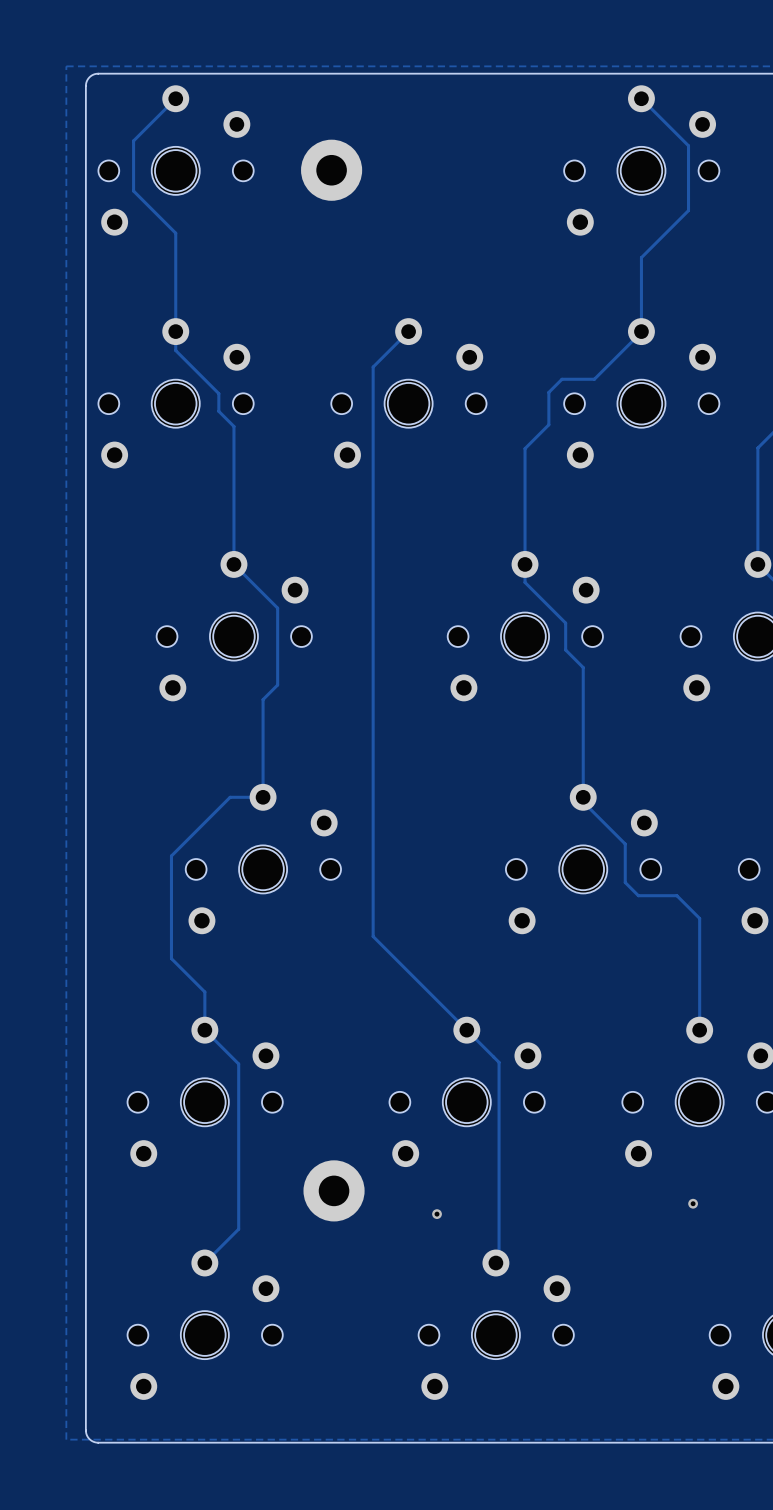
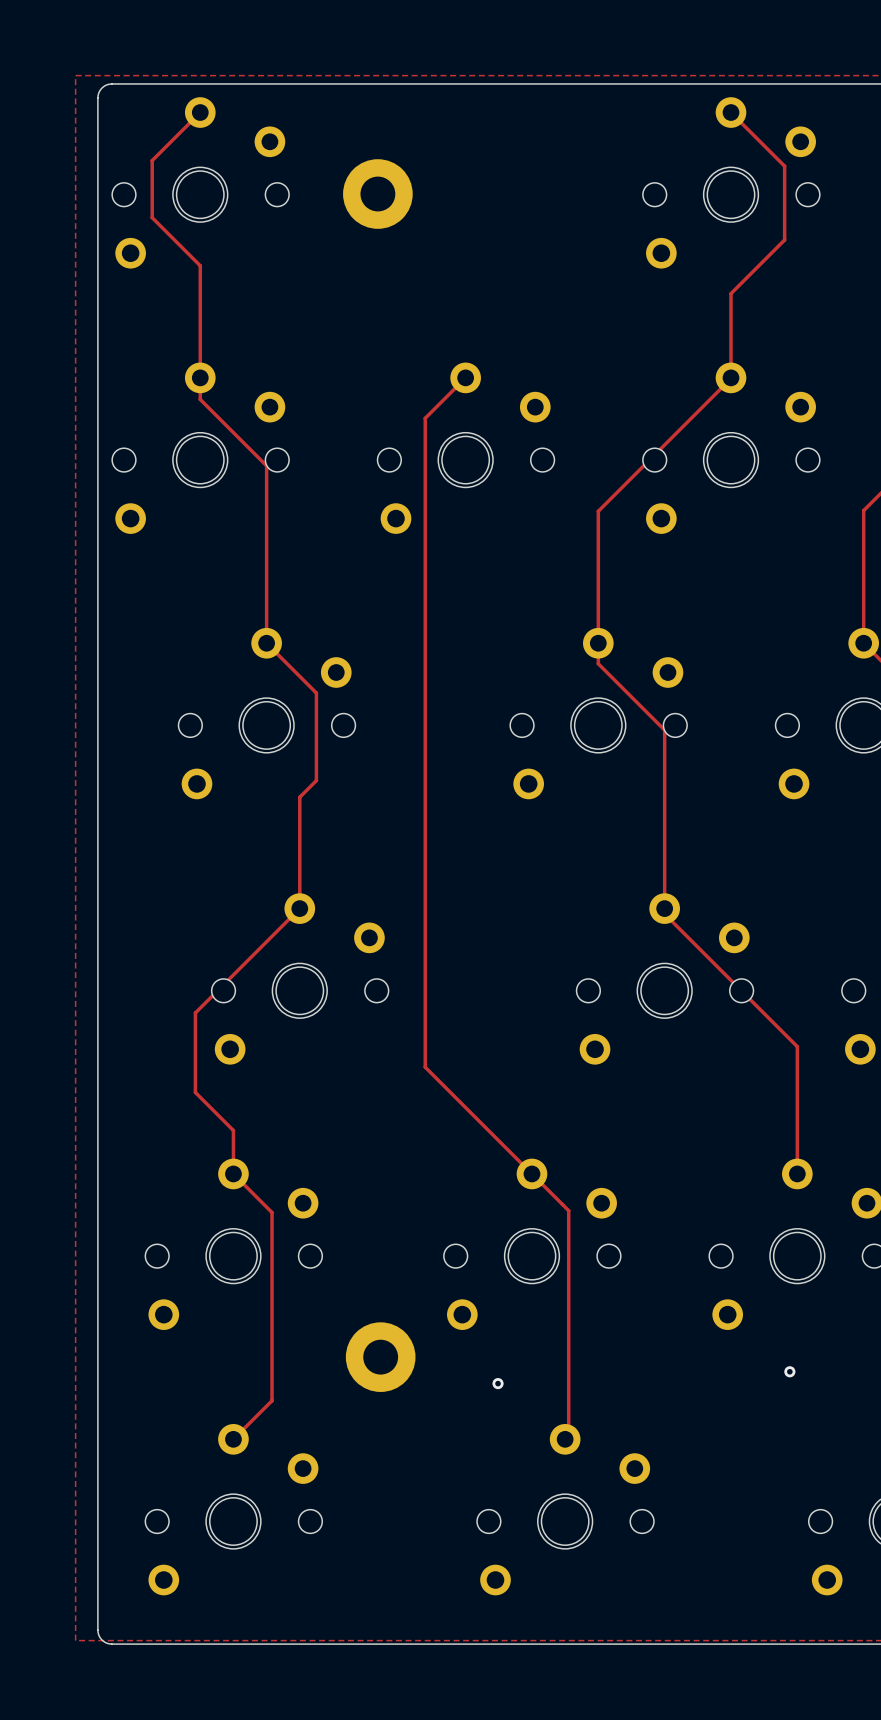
track: (594, 379) (562, 379) (548, 392) (548, 424) -> (677, 432) (625, 484)
track: (218, 393) (218, 411) (233, 426) -> (249, 448) (266, 465) (266, 486)
track: (565, 623) (565, 650) (583, 667) -> (644, 710) (664, 730) (664, 760)
track: (263, 797) (230, 797) (171, 855) (171, 888) -> (299, 908) (195, 1012)
track: (625, 844) (625, 882) (638, 895) (676, 895) -> (712, 961) (771, 1020)

